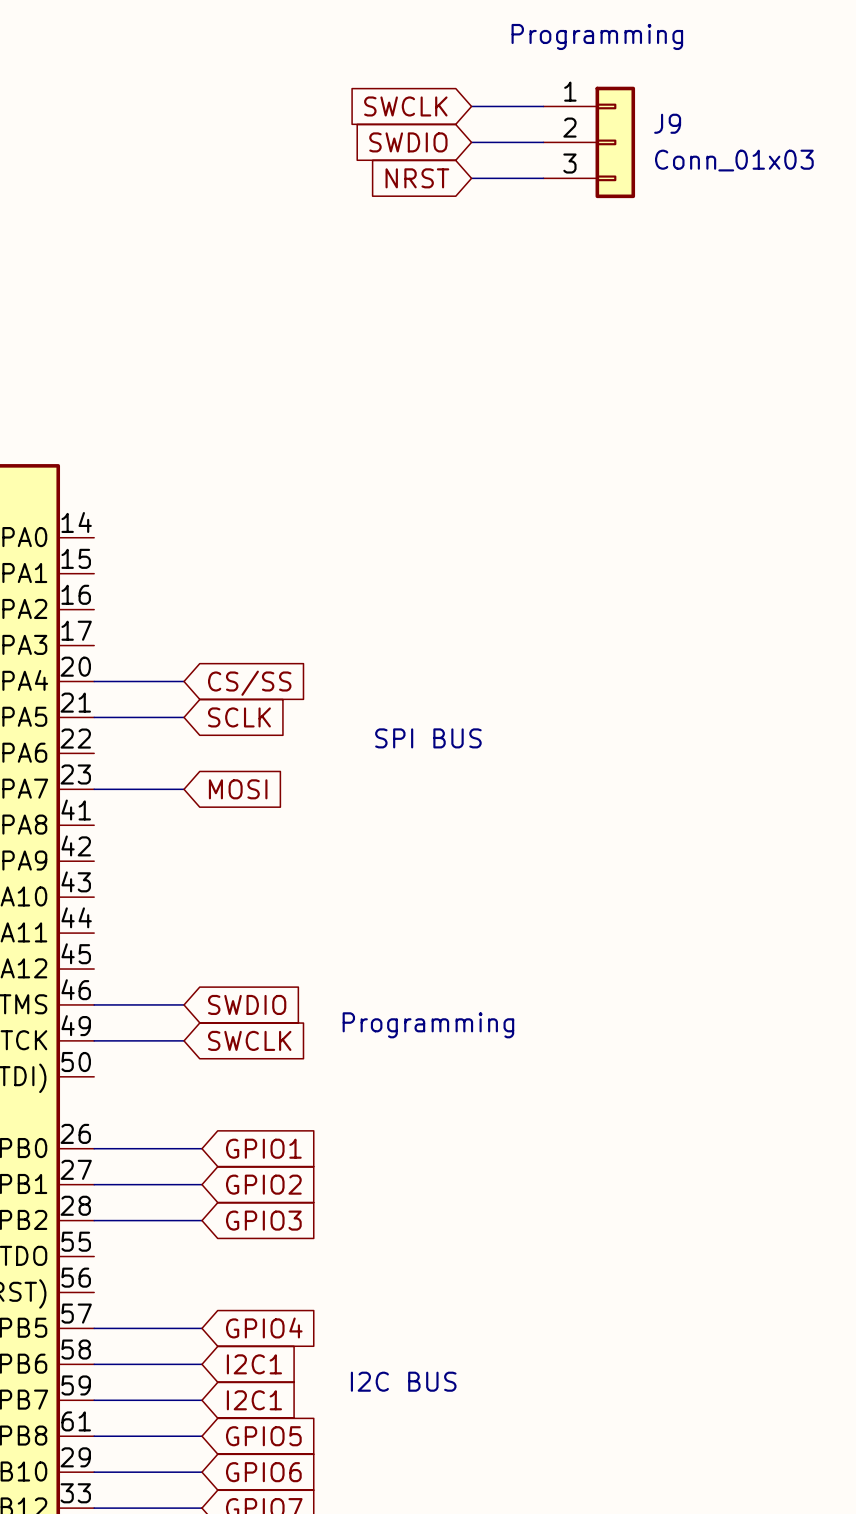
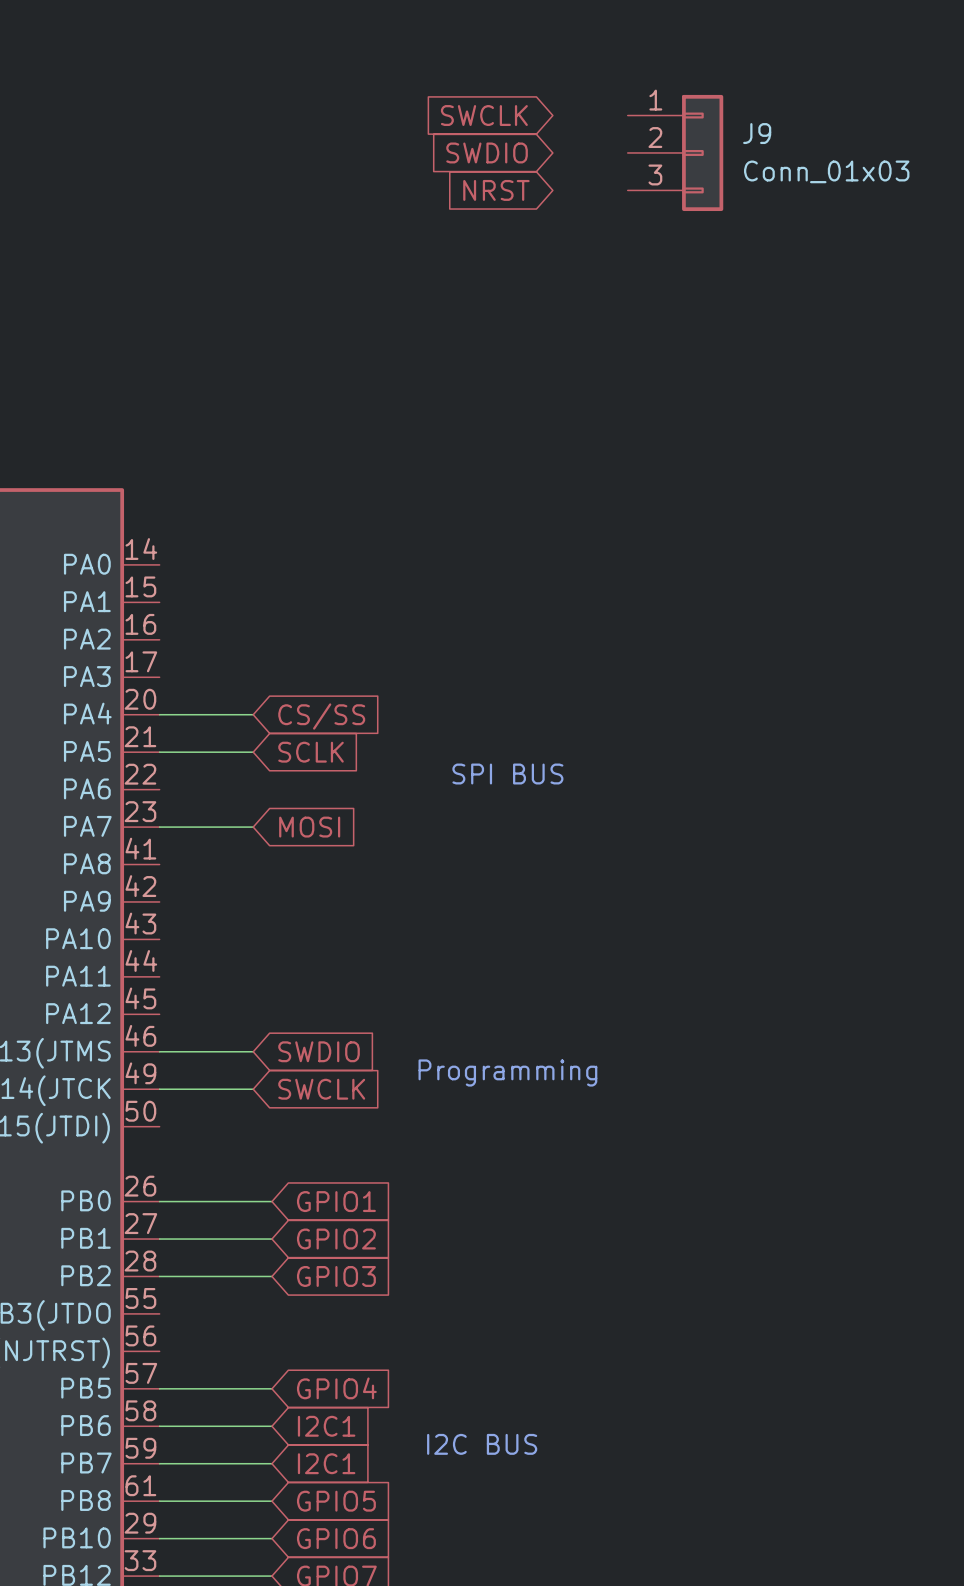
text: Programming (597, 36) -> none
wire: (471, 106) (543, 106) -> none
wire: (471, 142) (543, 142) -> none
wire: (471, 178) (543, 178) -> none

